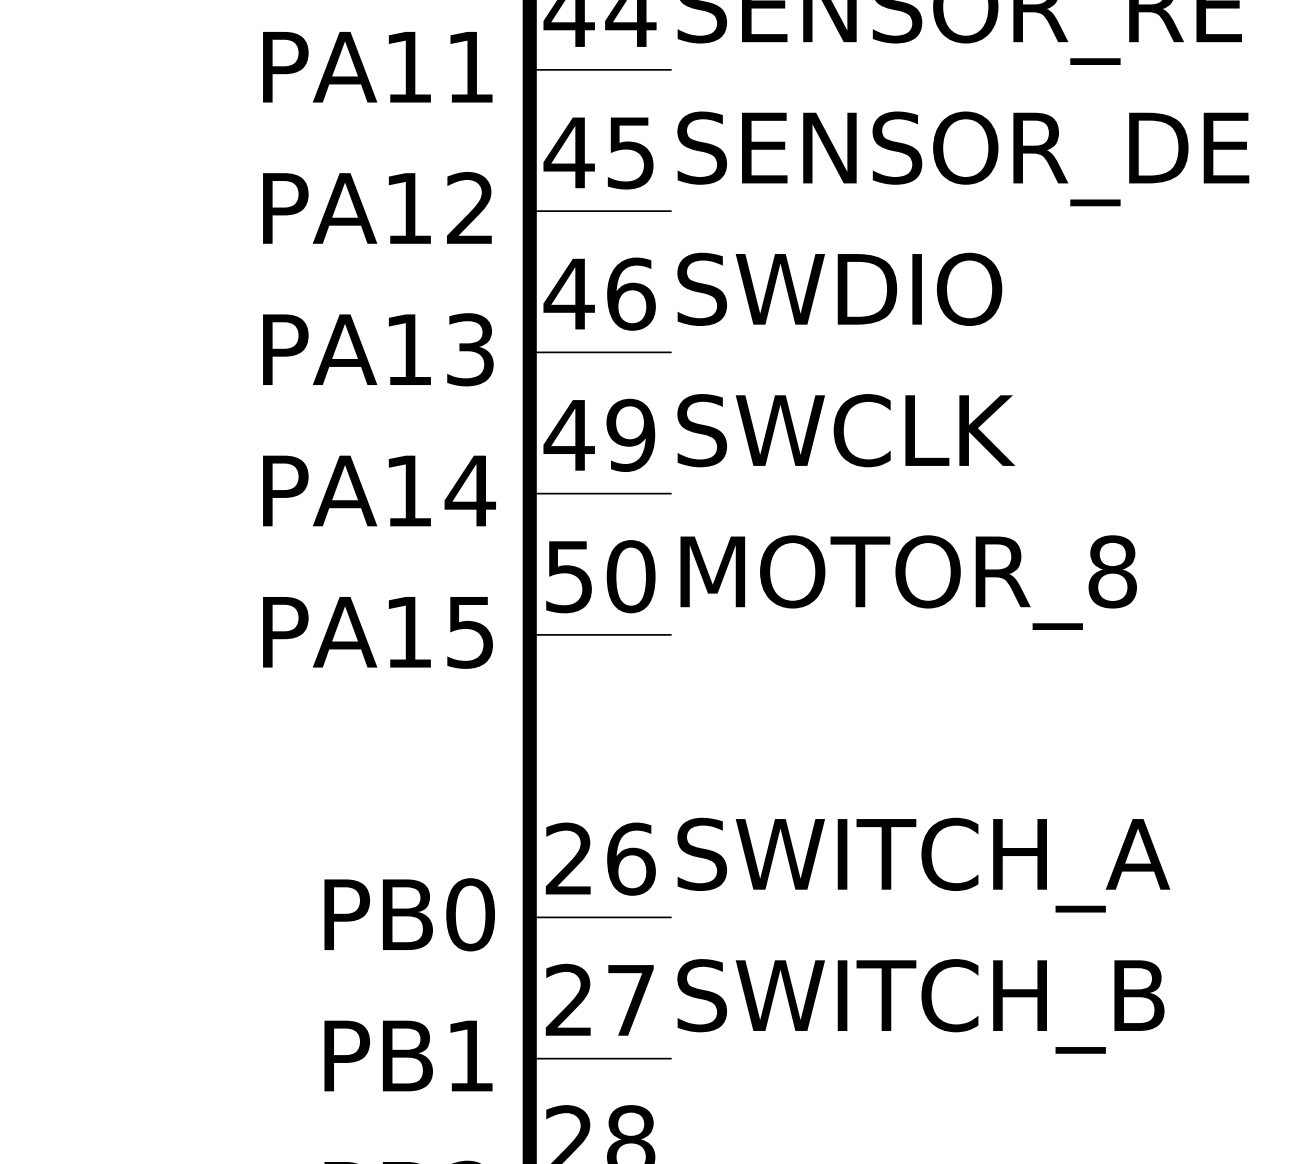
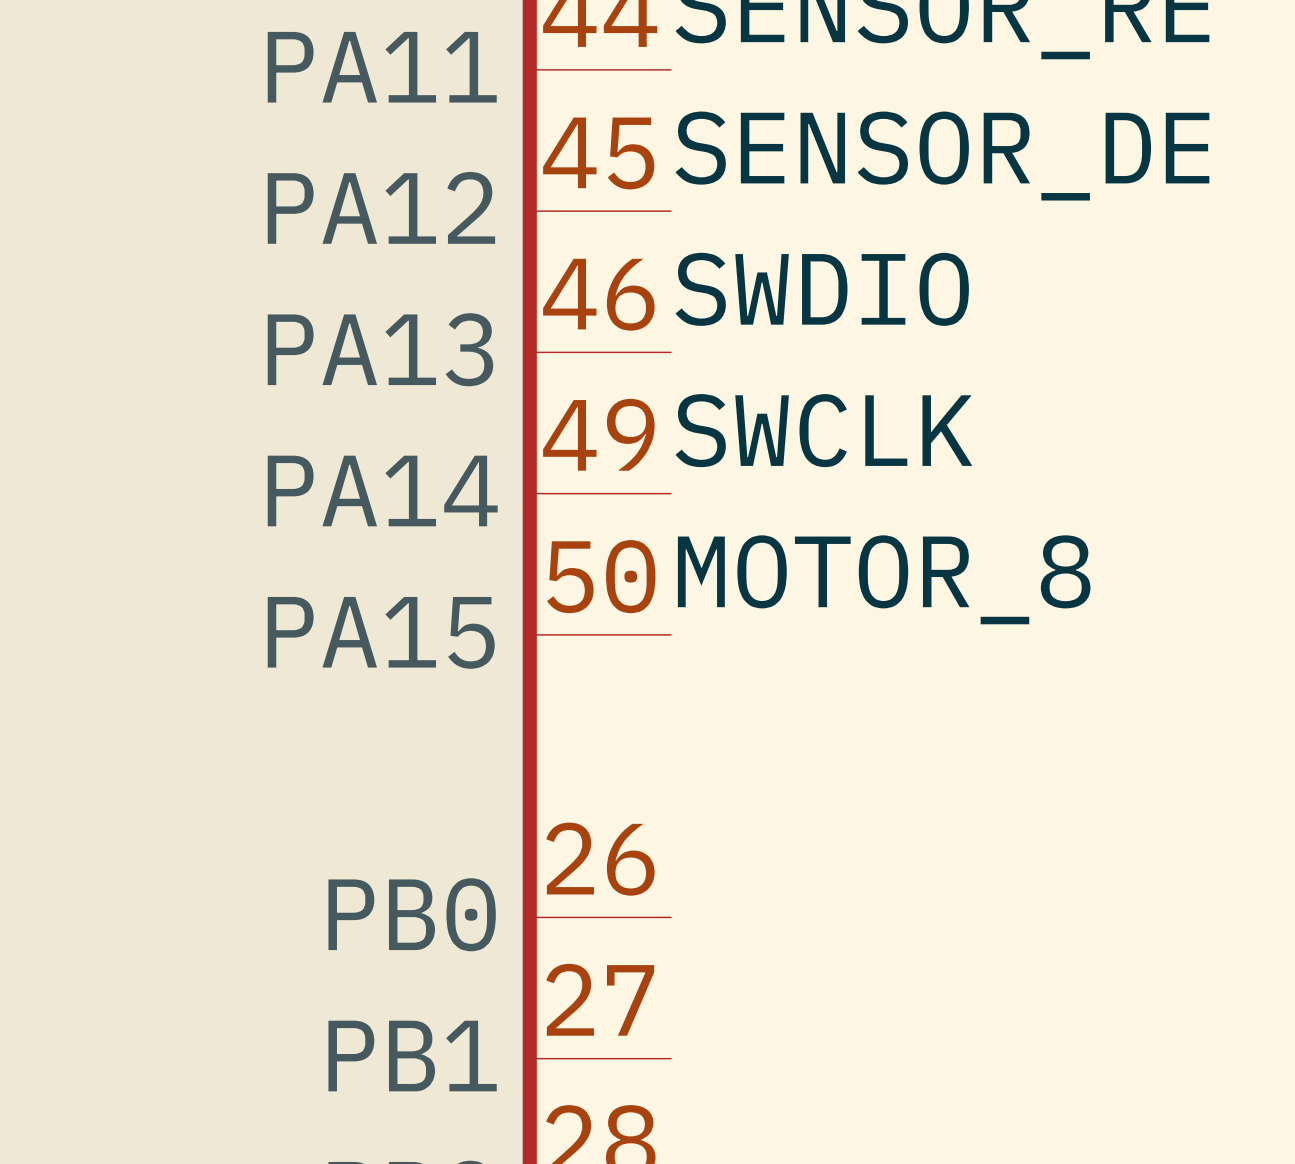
label: SWITCH_A (923, 865) -> none
label: SWITCH_B (920, 1006) -> none

